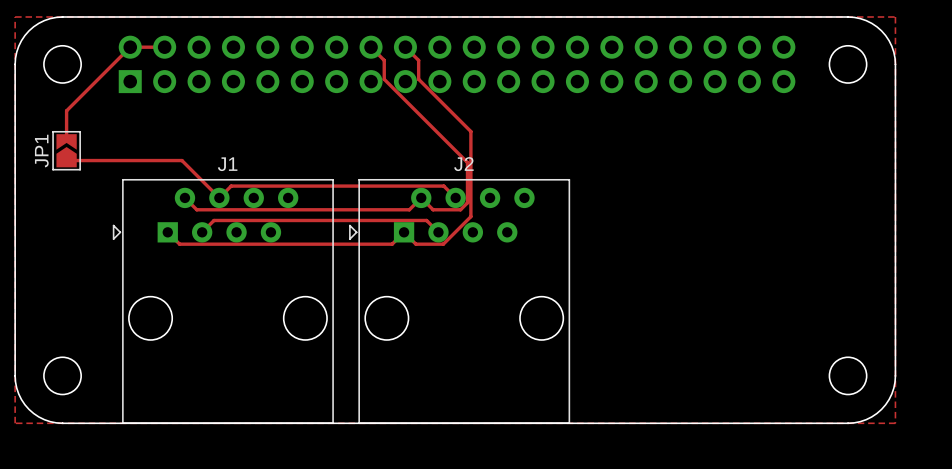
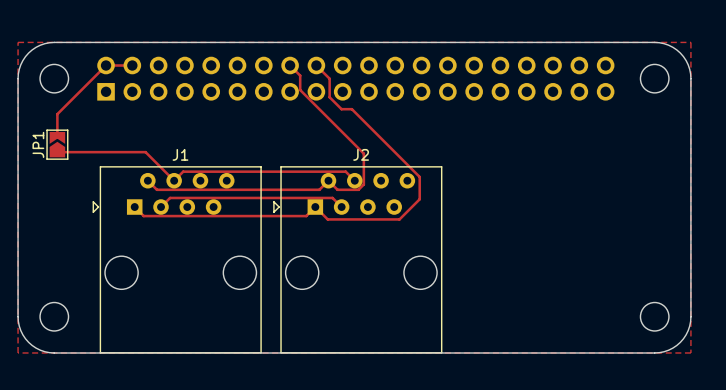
track: (418, 60) (418, 79) (470, 131) (470, 216) (443, 244) (415, 244) -> (326, 75) (329, 78) (329, 97) (341, 109) (351, 109) (419, 177) (419, 199) (399, 219) (327, 219) (324, 216)

